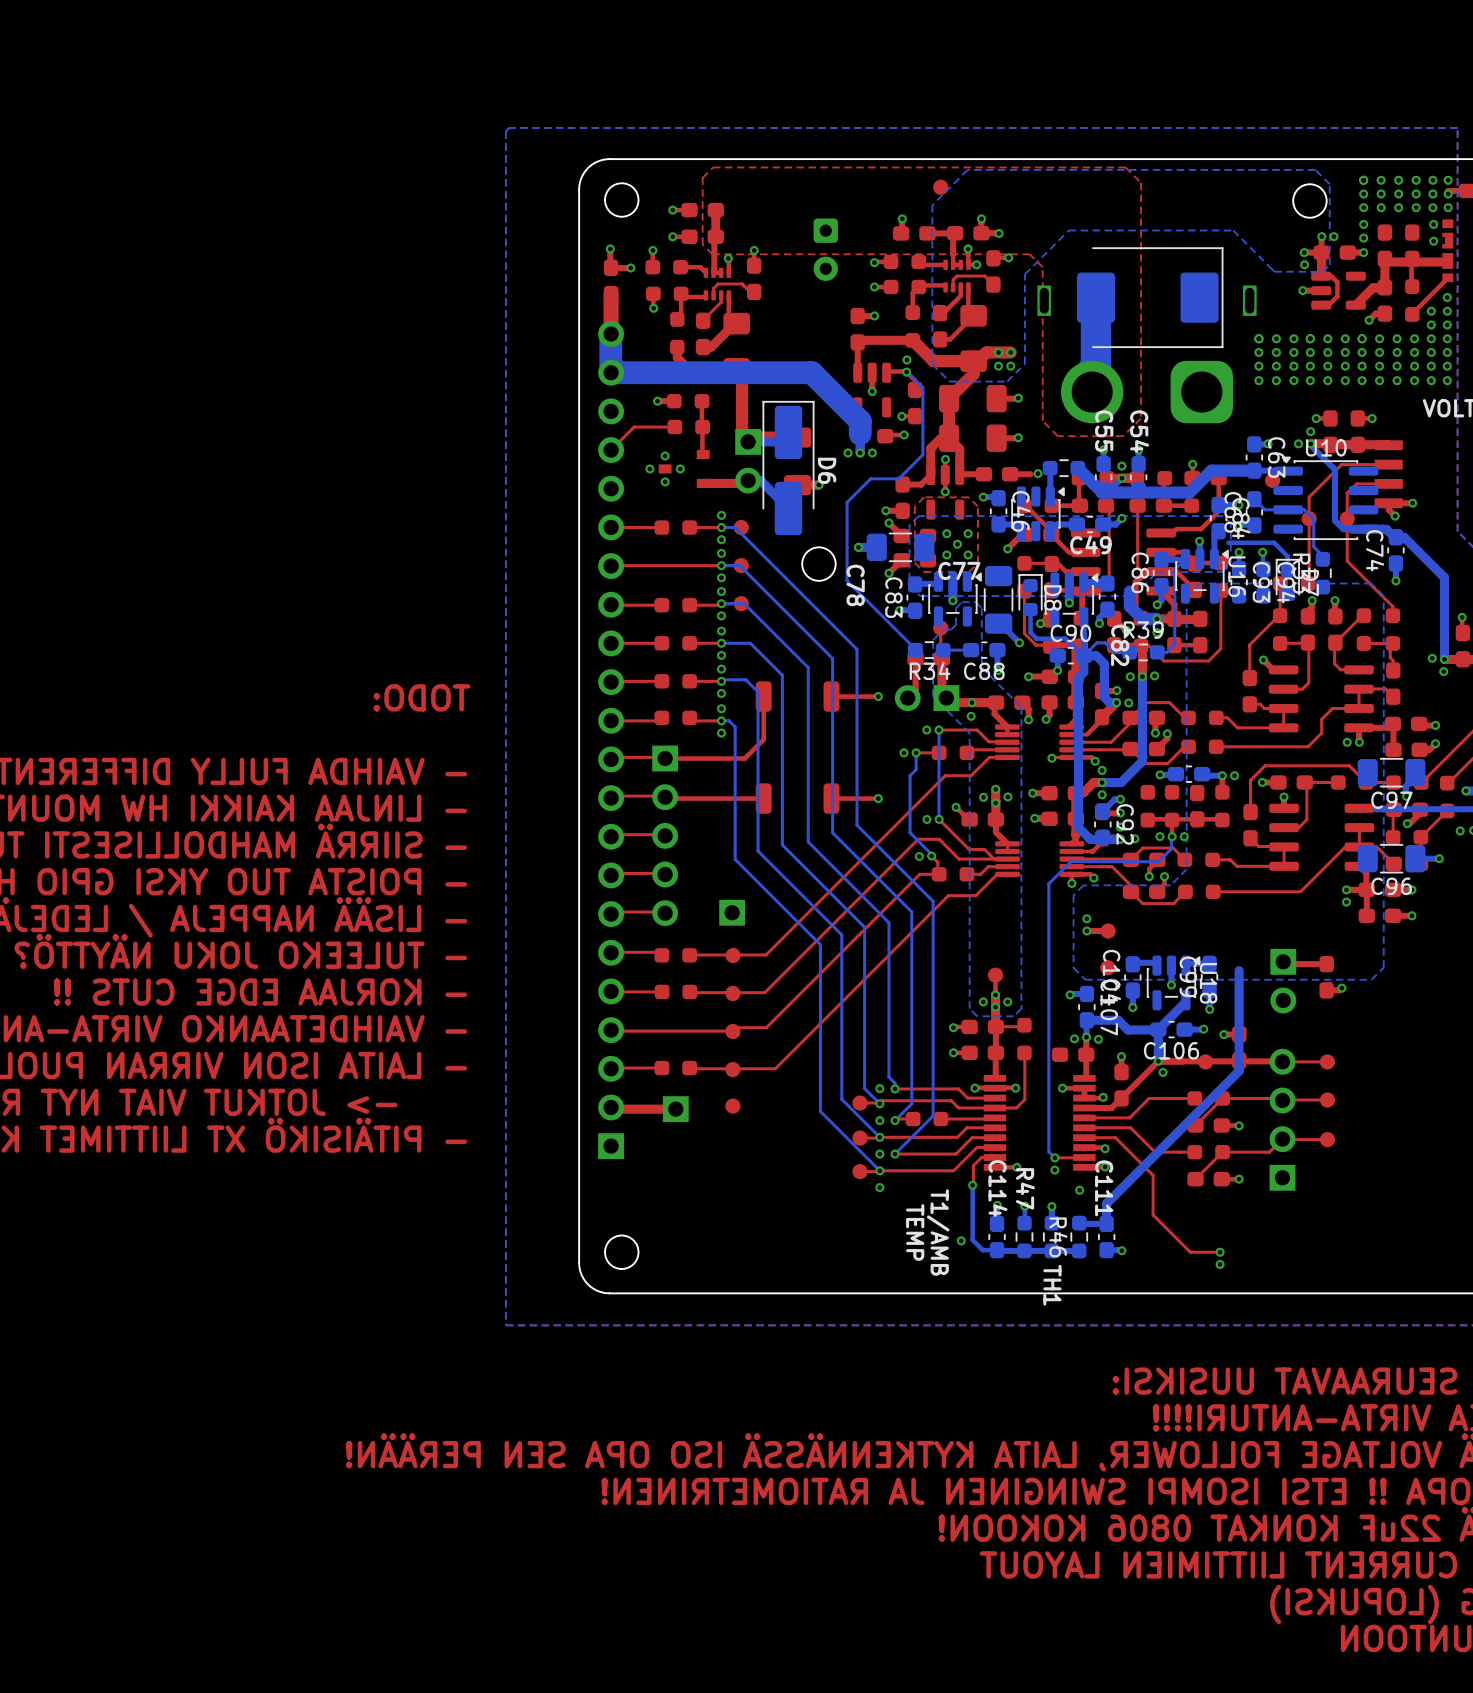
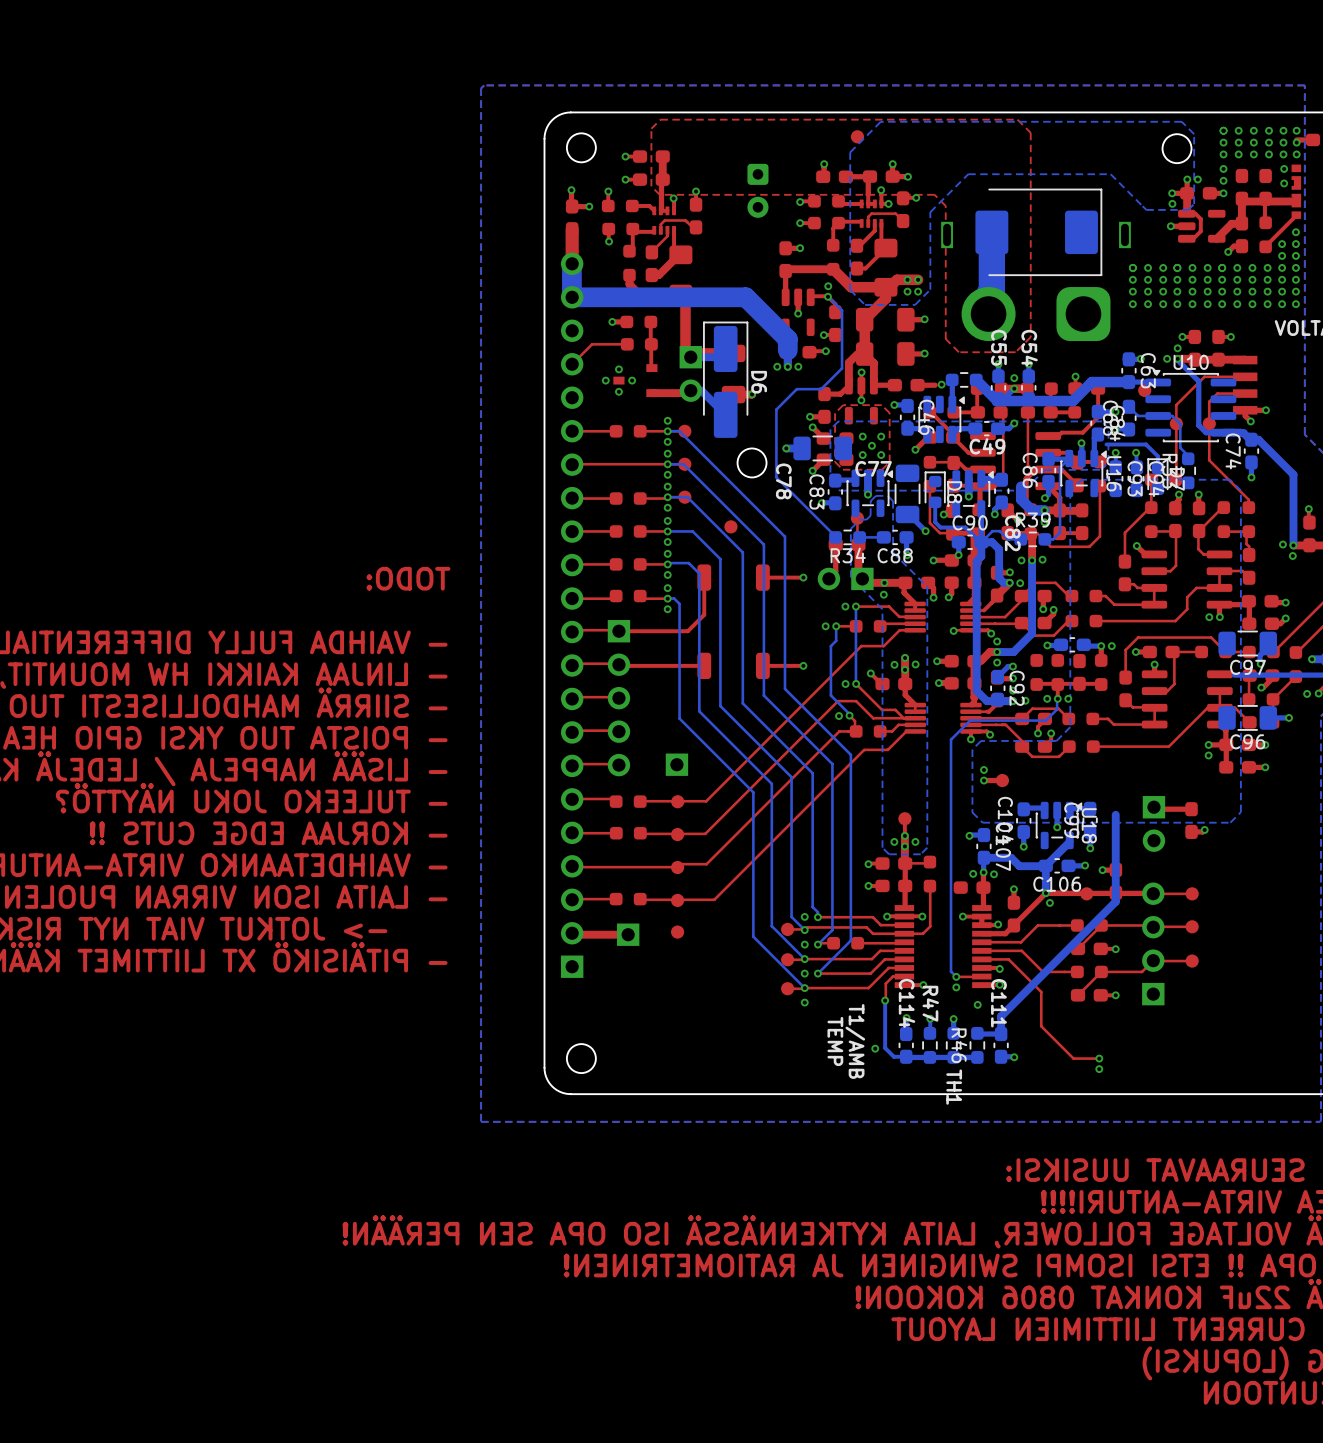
part: none -> (730, 526)
part: (1107, 967) -> none

